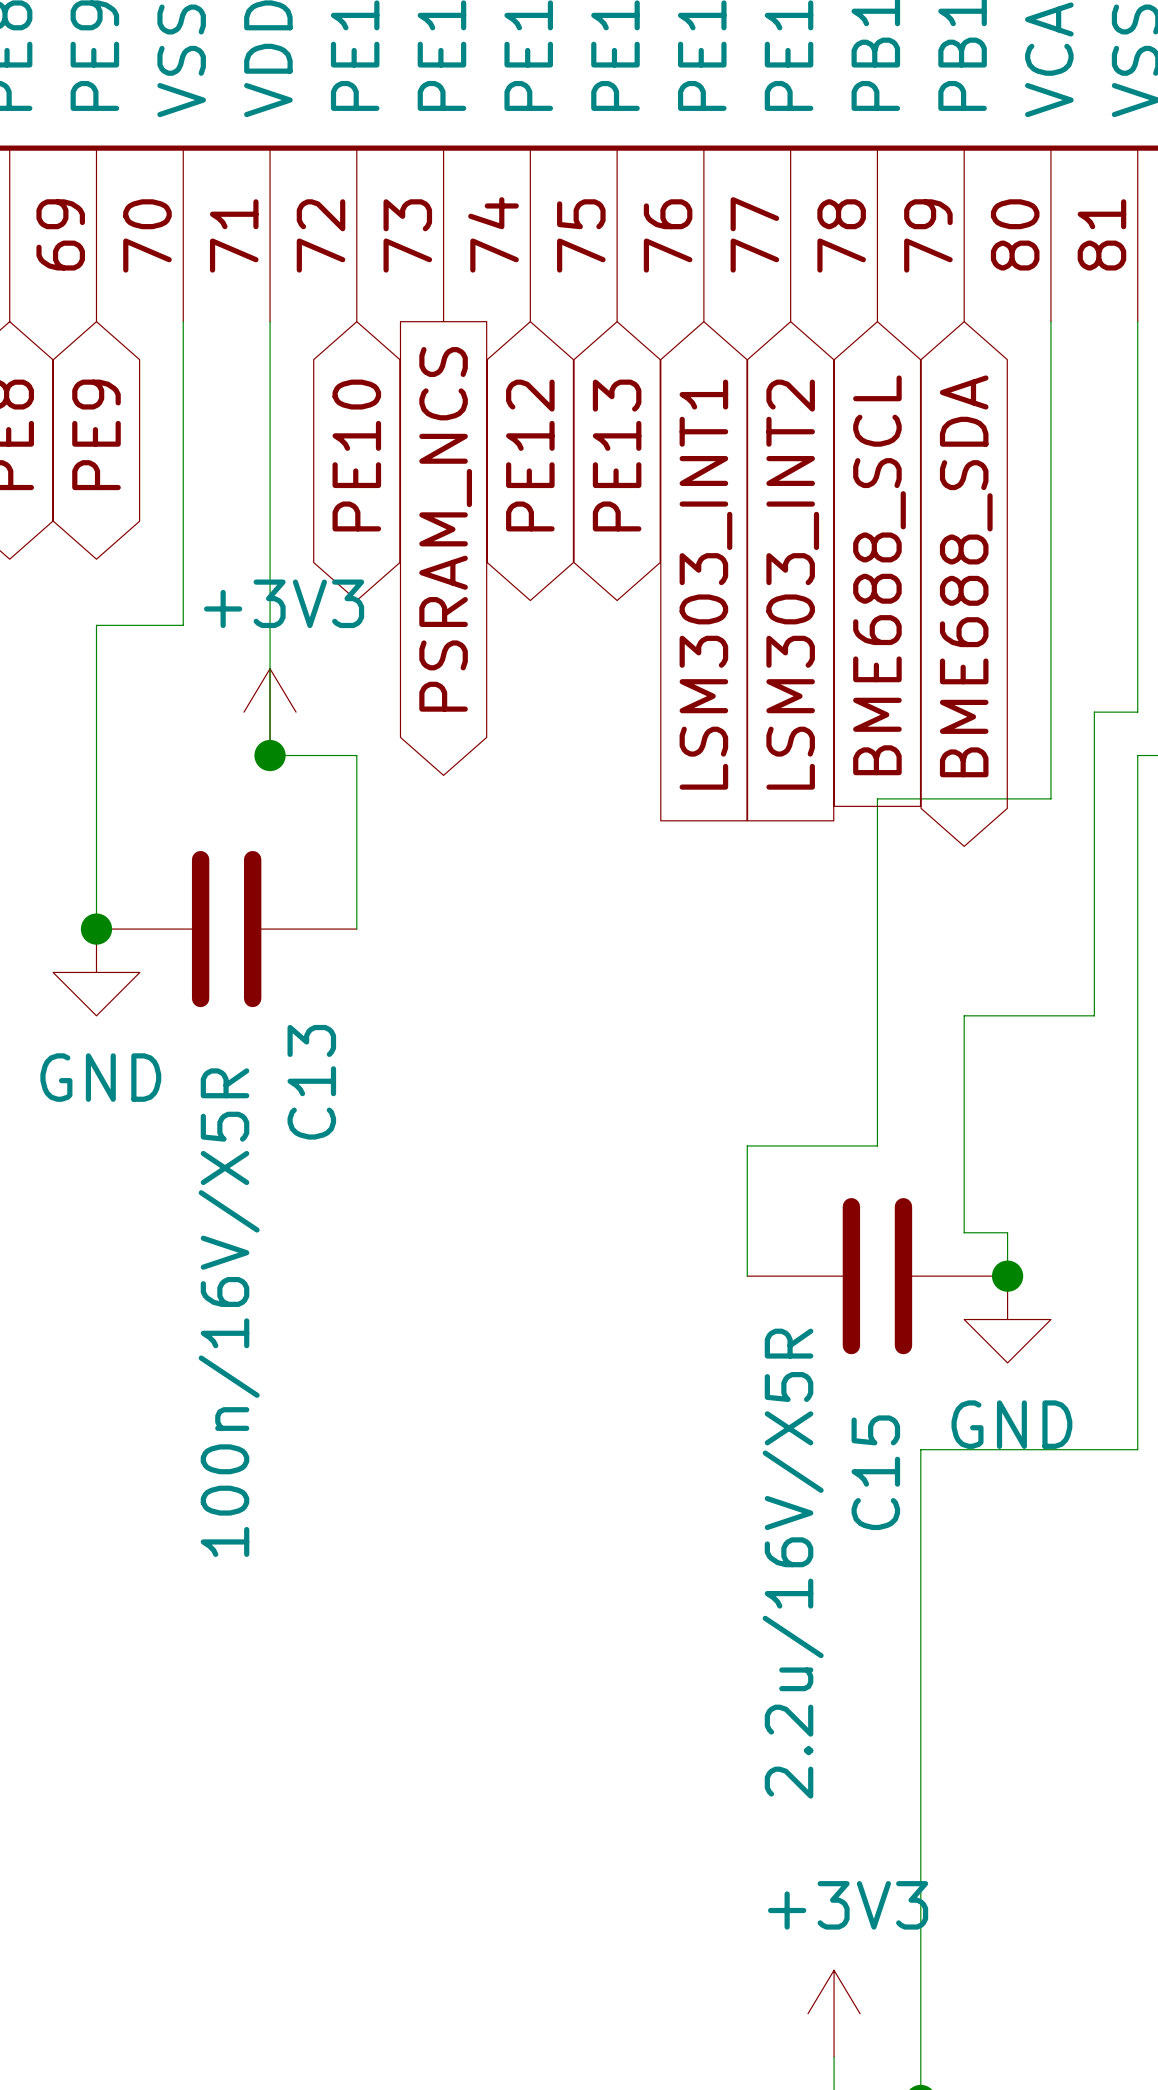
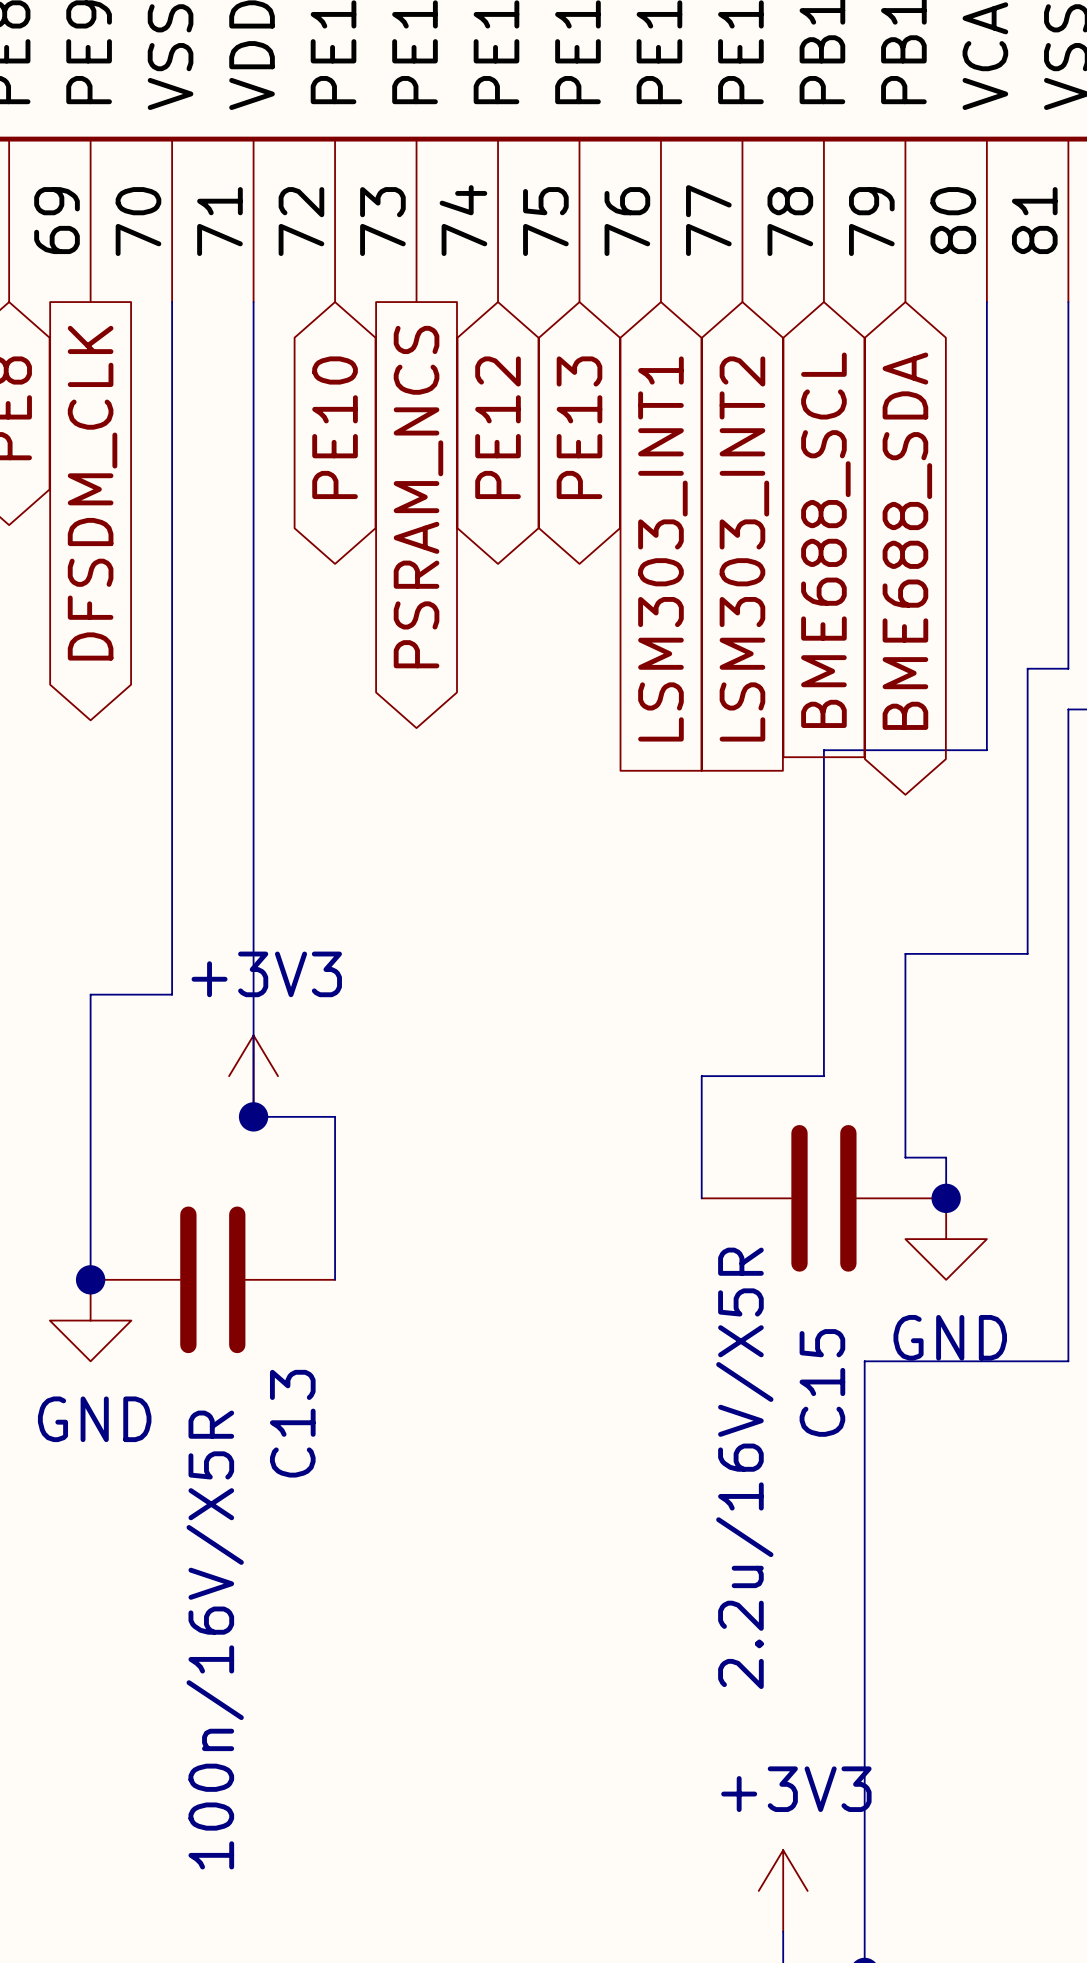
global label shape: bidirectional (96, 434) -> output (92, 493)
global label: PE9 (96, 434) -> DFSDM_CLK (92, 493)
wire: (183, 625) (96, 625) (96, 929) -> (172, 587) (172, 994) (90, 994) (90, 1279)
power symbol position: +3V3 (270, 712) -> +3V3 (253, 1076)
wire: (270, 755) (356, 755) (356, 929) -> (253, 709) (253, 1116) (335, 1116) (335, 1279)
junction: (270, 755) -> none
junction: (96, 929) -> none
C13 position: (226, 929) -> (212, 1279)
power symbol position: GND (96, 972) -> GND (90, 1320)
junction: none -> (253, 1116)
junction: none -> (90, 1279)

